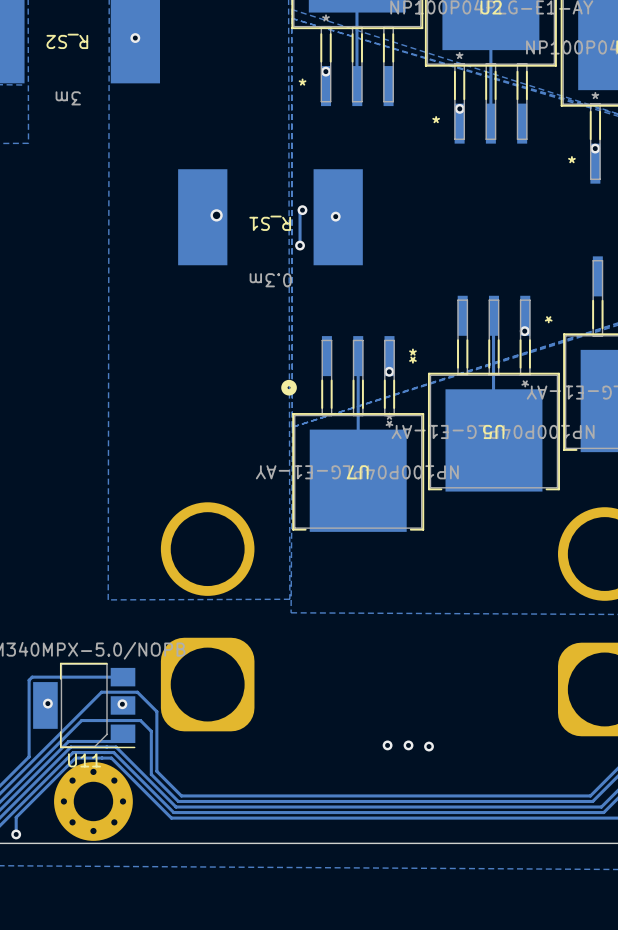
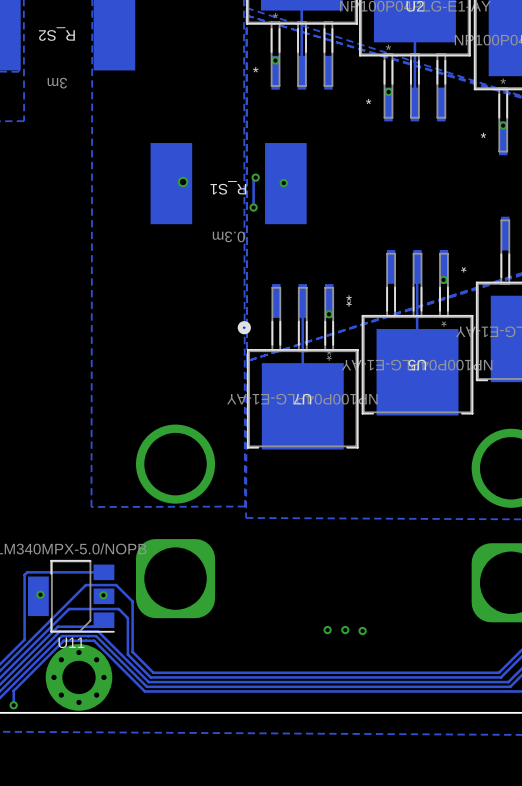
via: (135, 38) -> none

